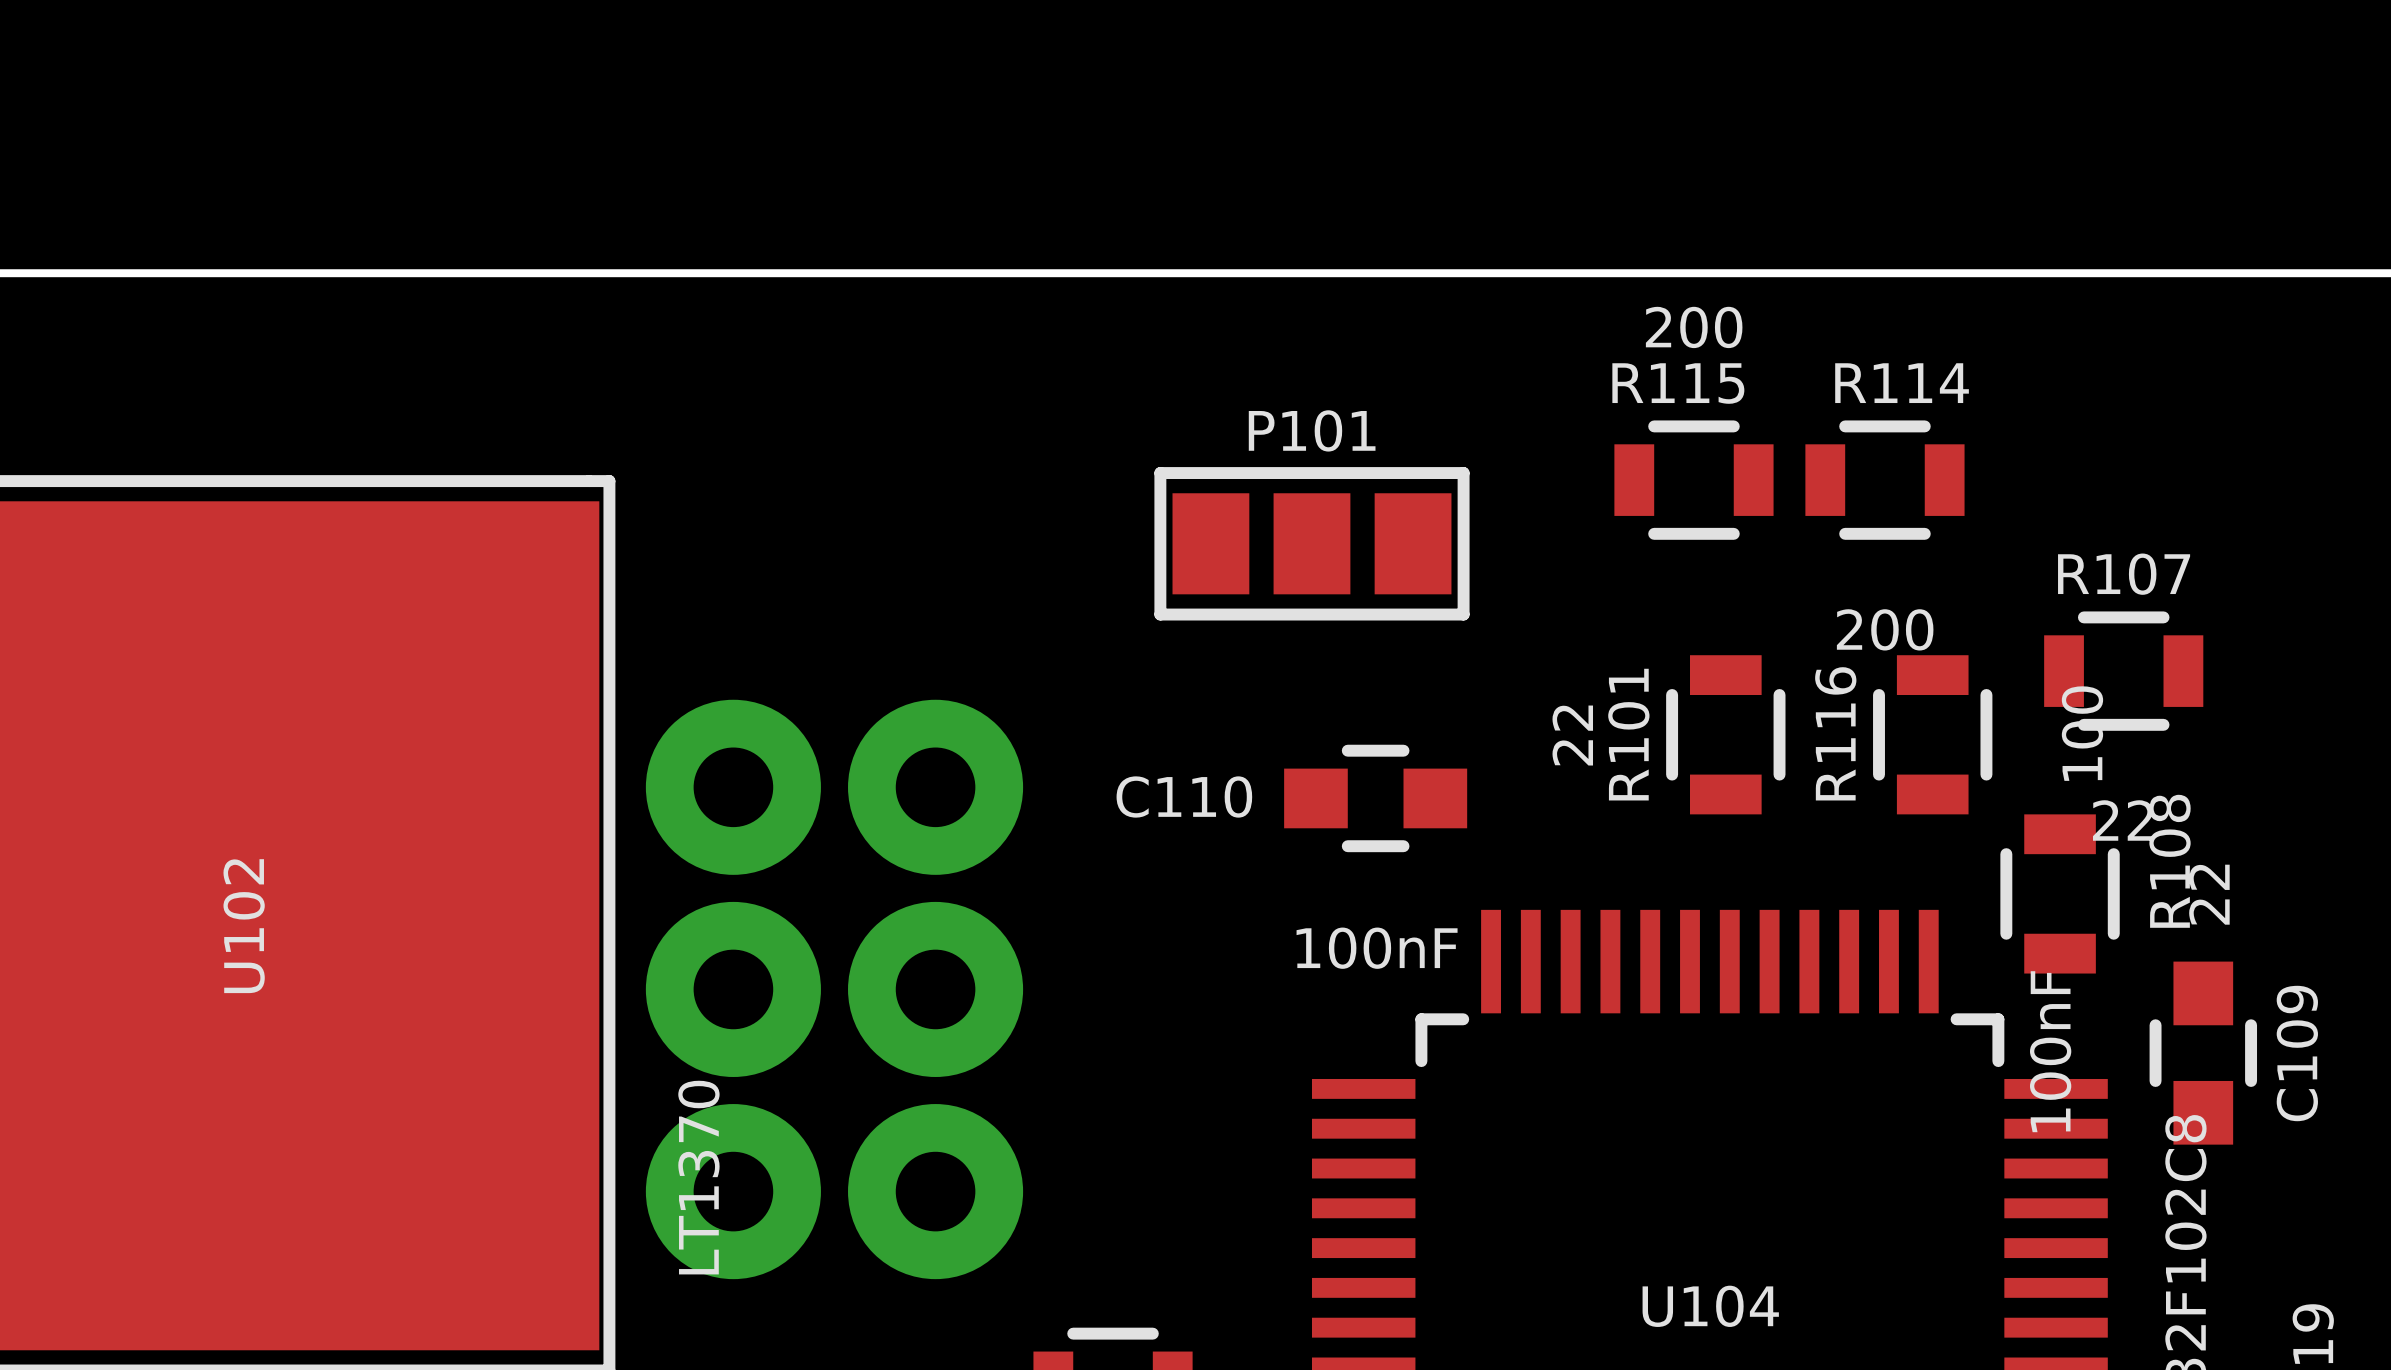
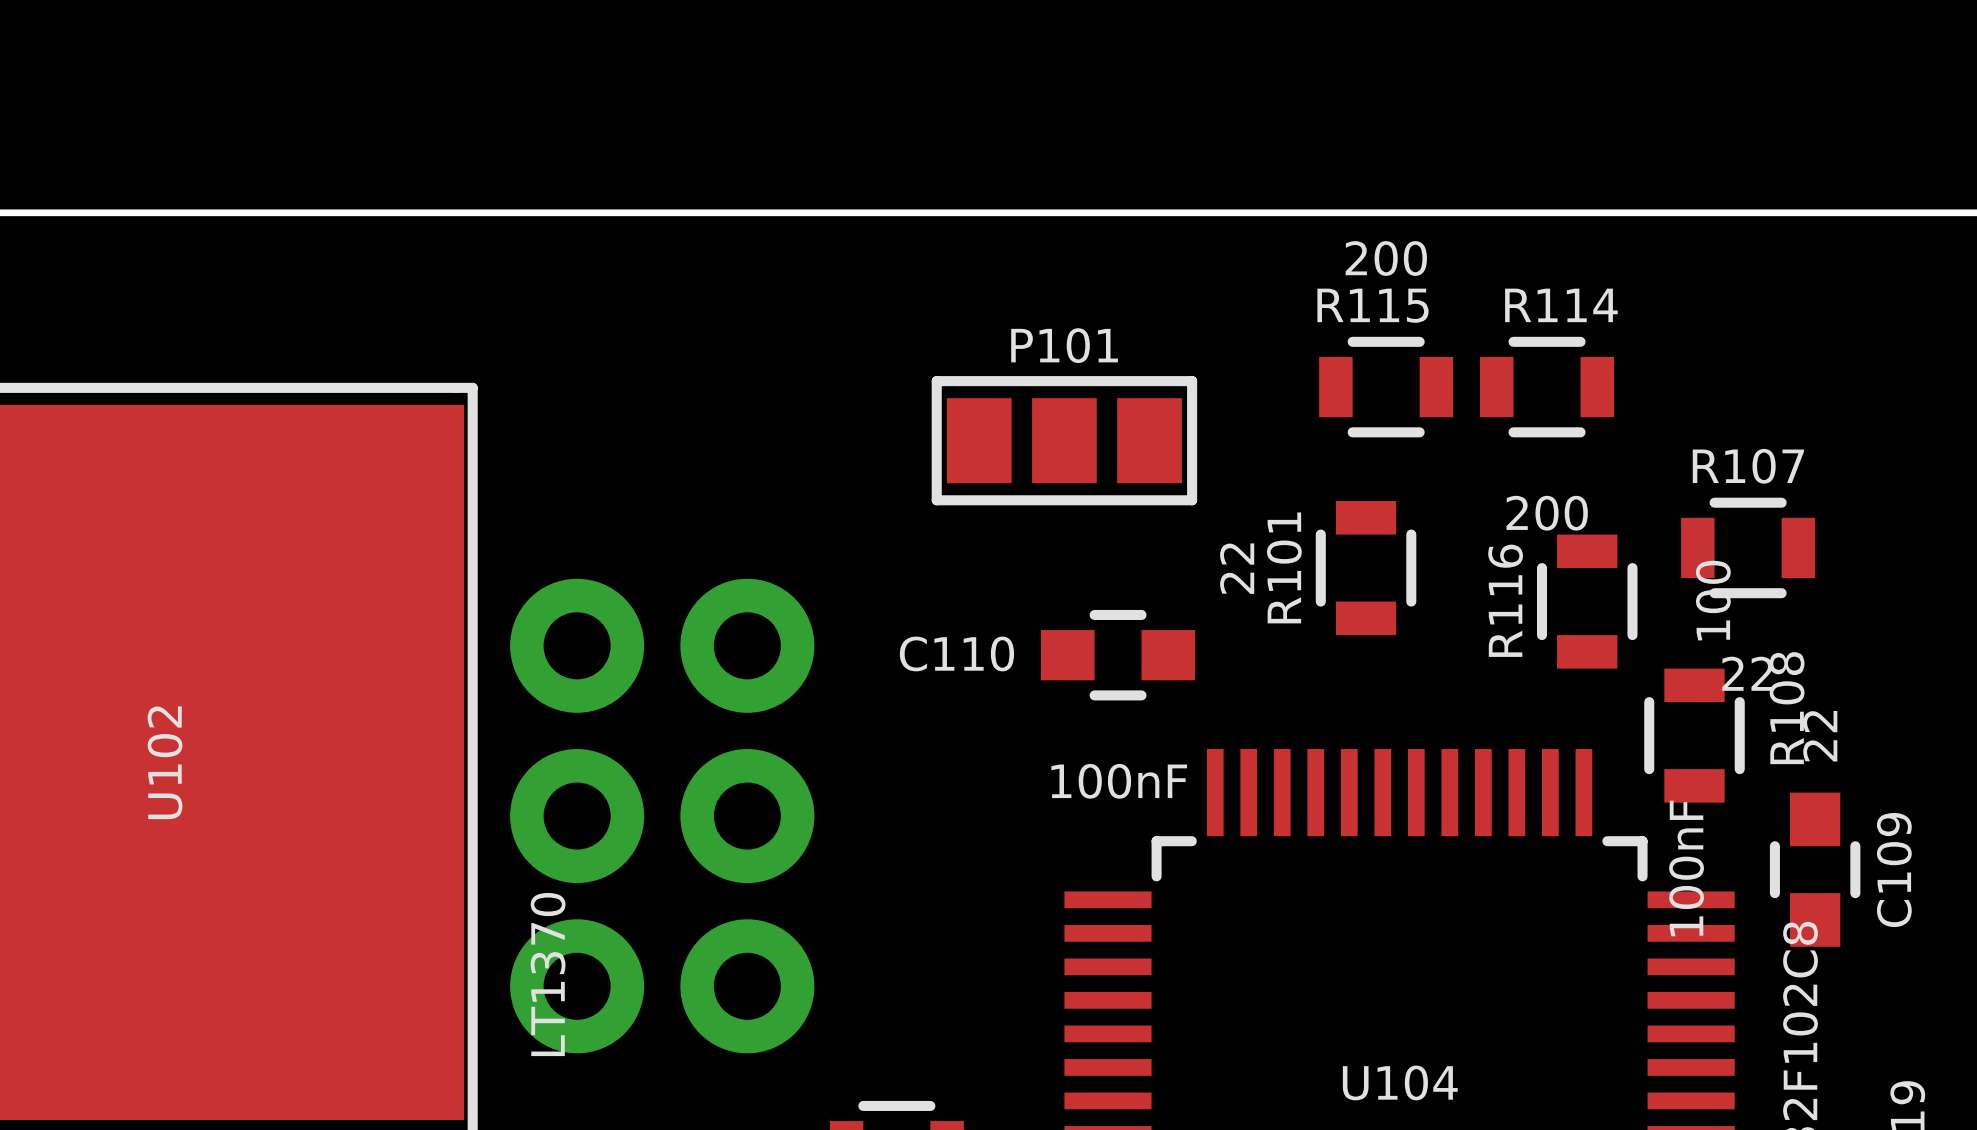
part footprint: [645, 699, 1024, 1280] -> [510, 578, 815, 1054]
R101 position: (1725, 734) -> (1366, 568)

